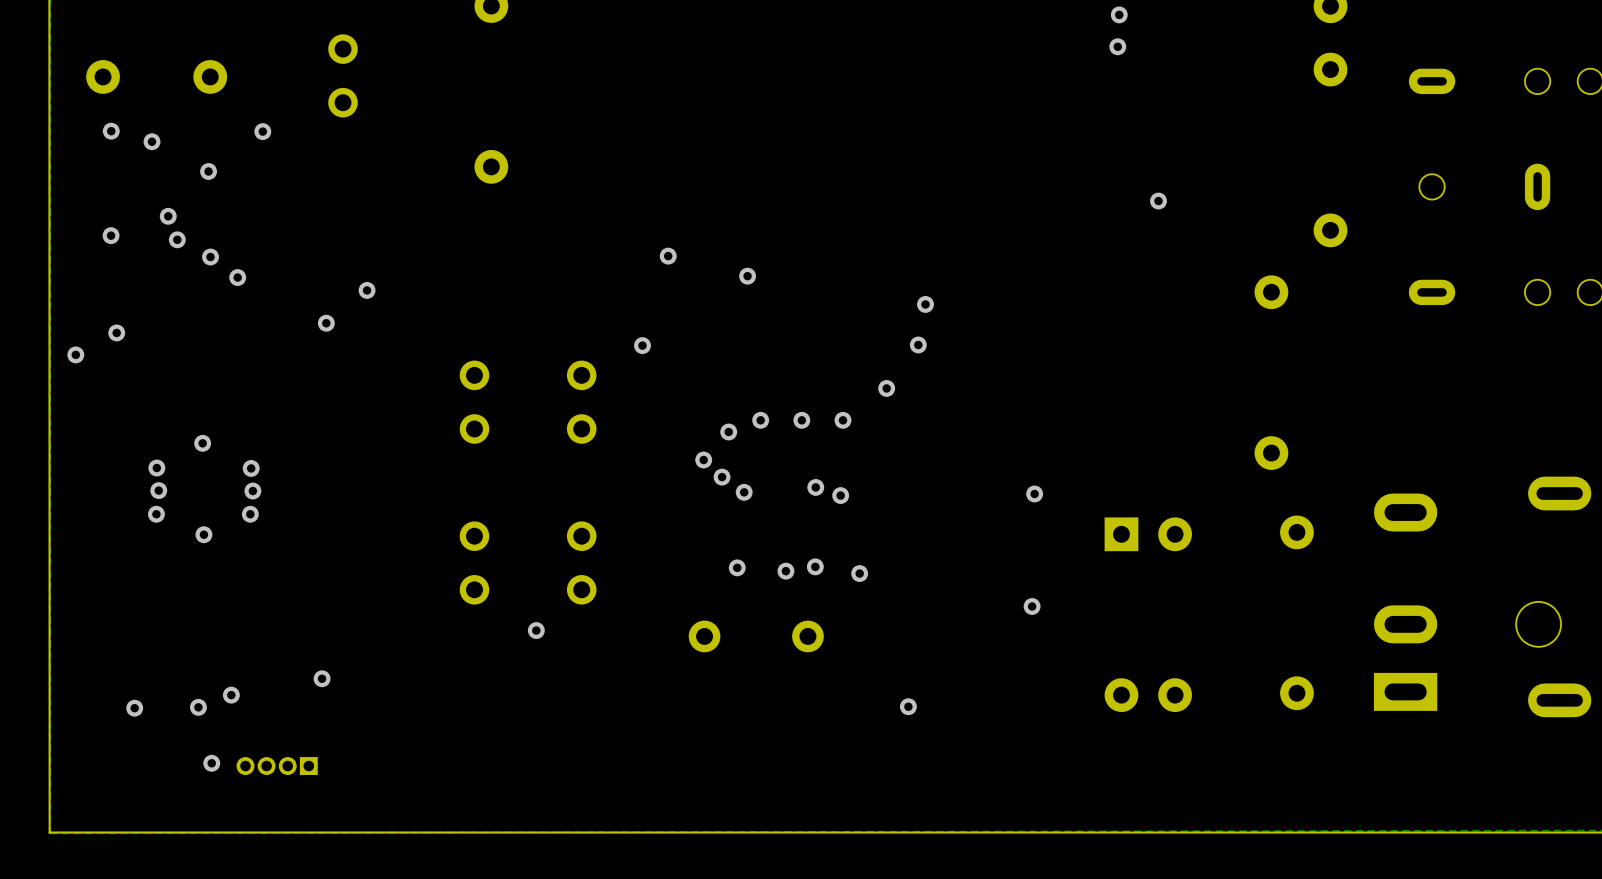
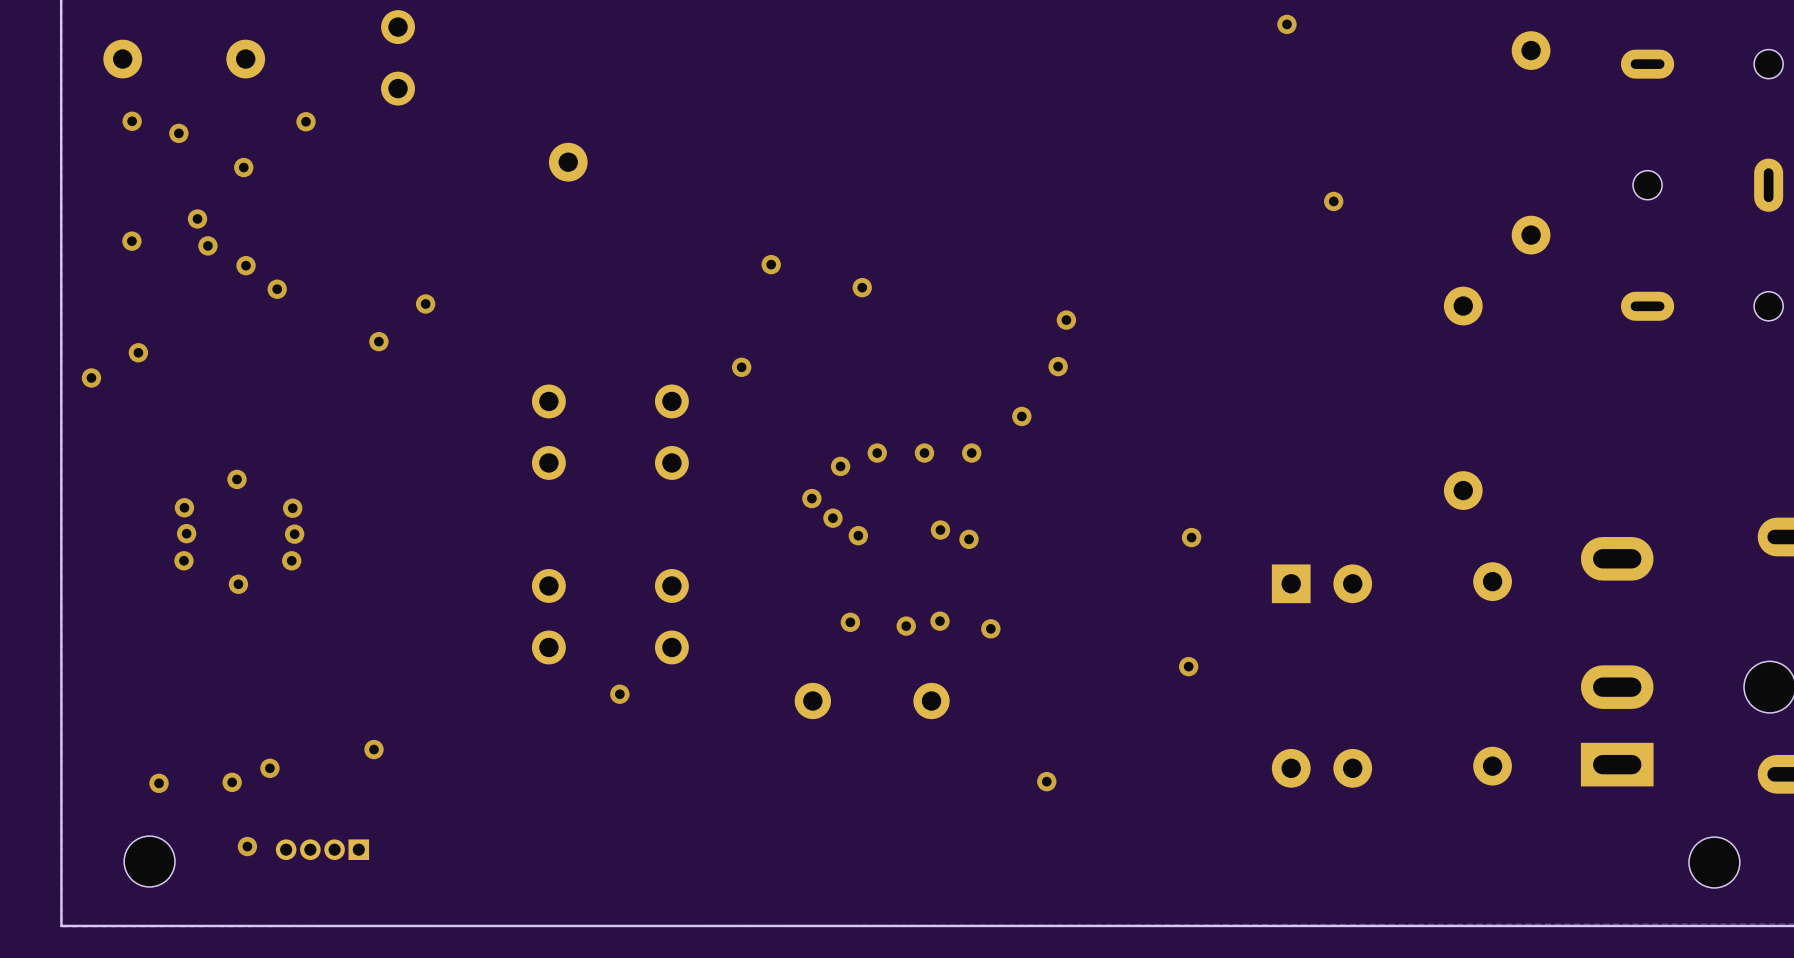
part: none -> (149, 861)
part: none -> (1714, 862)

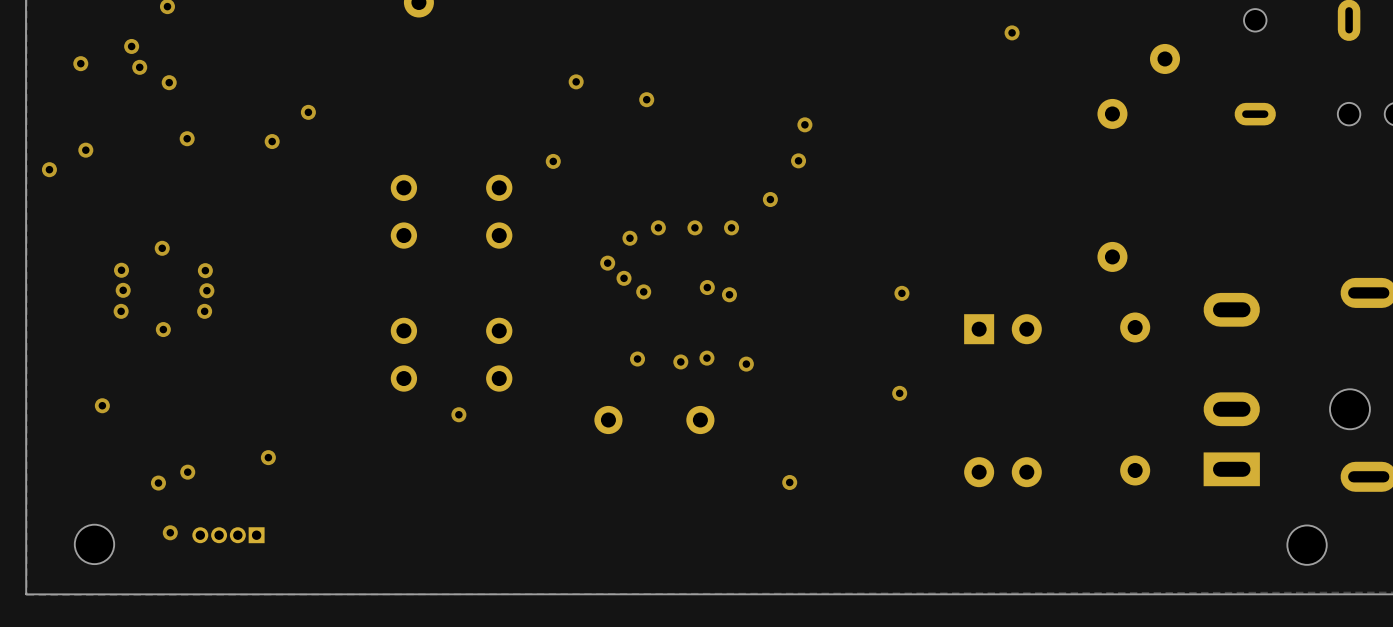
via position: (277, 289) -> (187, 138)
via position: (159, 783) -> (102, 405)

